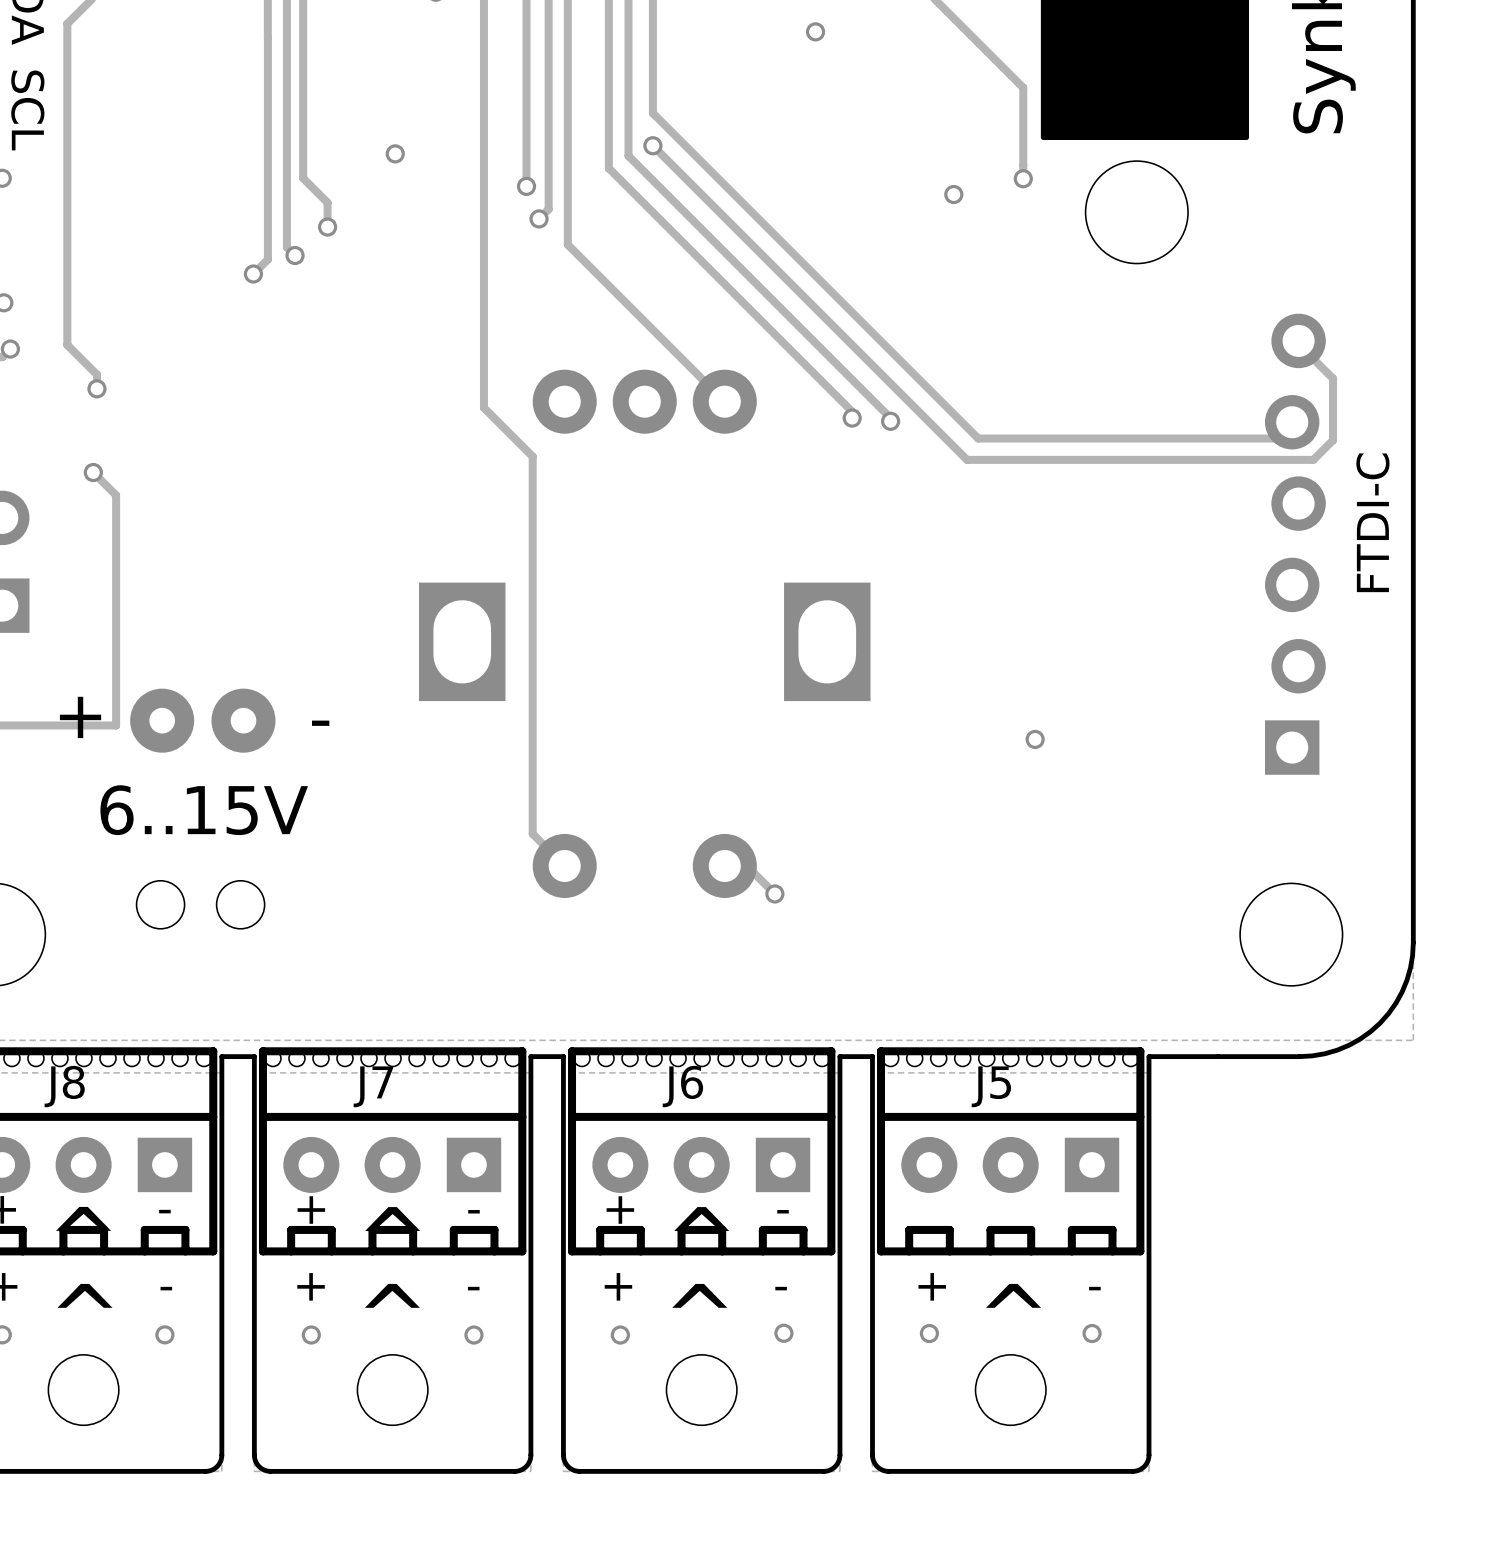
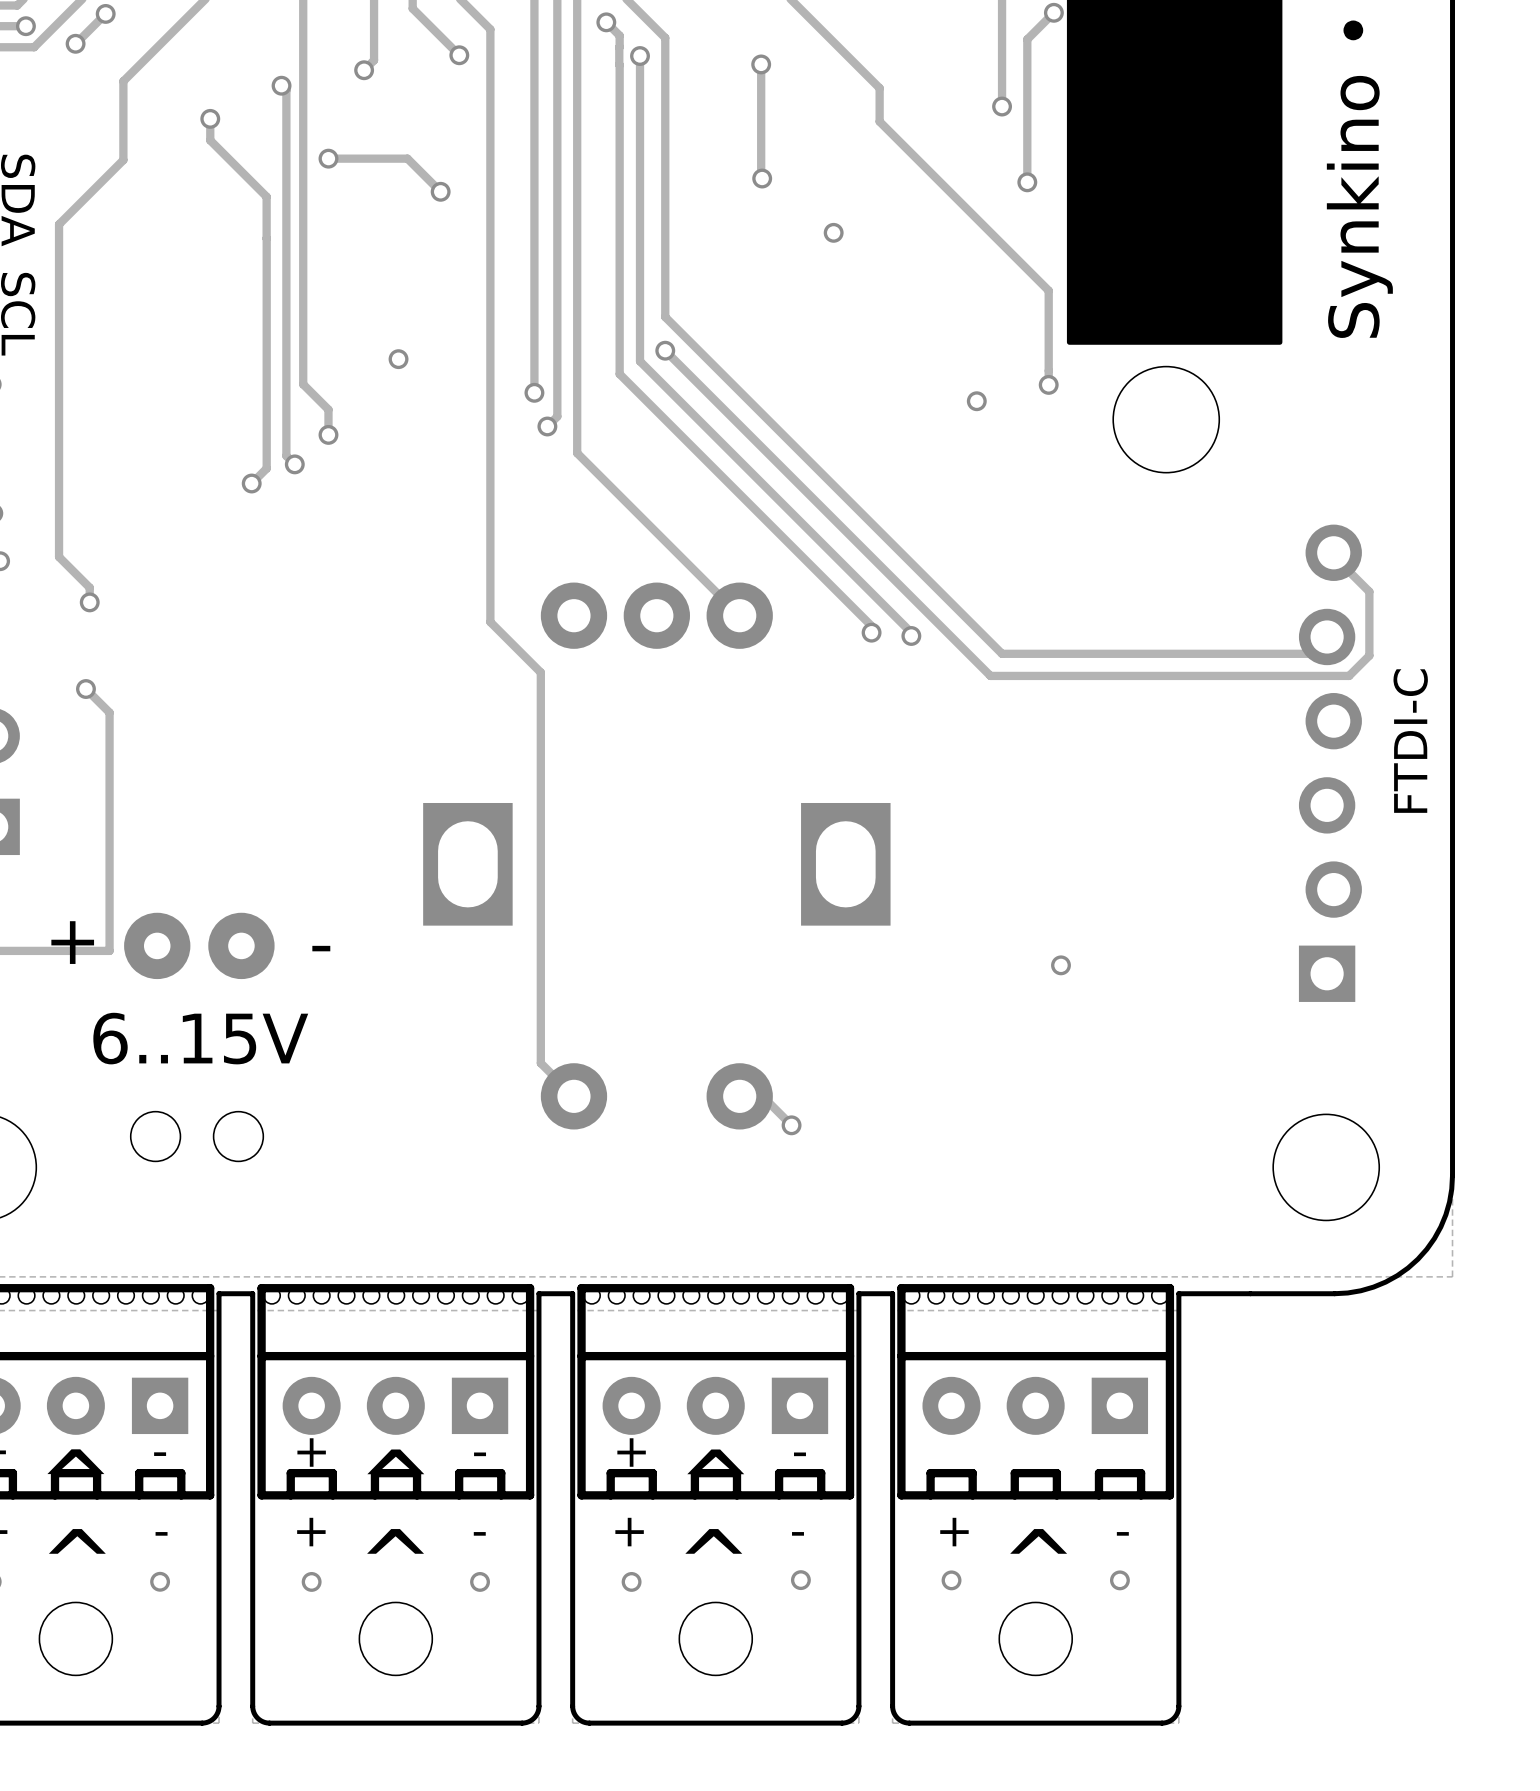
J8 name: J8 (64, 1086) -> none
J7 name: J7 (373, 1086) -> none
J6 name: J6 (682, 1086) -> none
J5 name: J5 (991, 1086) -> none

